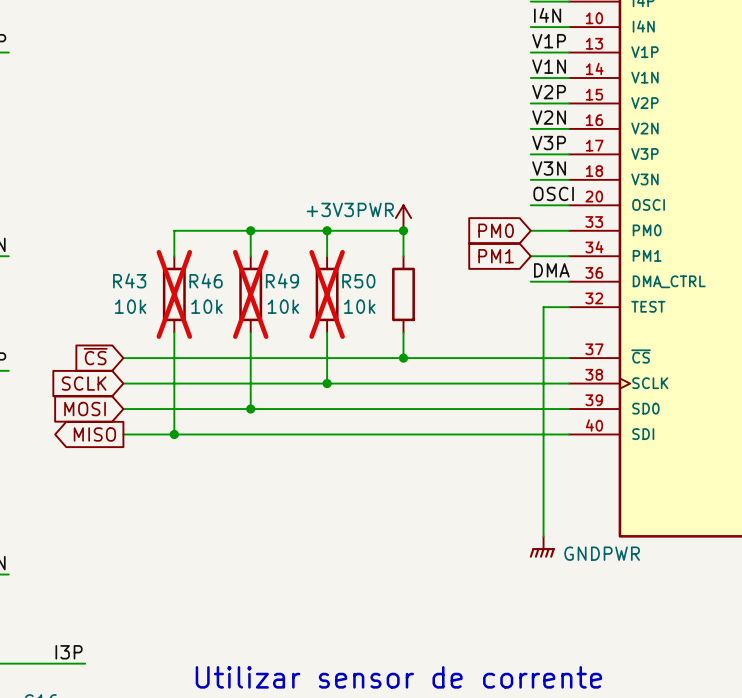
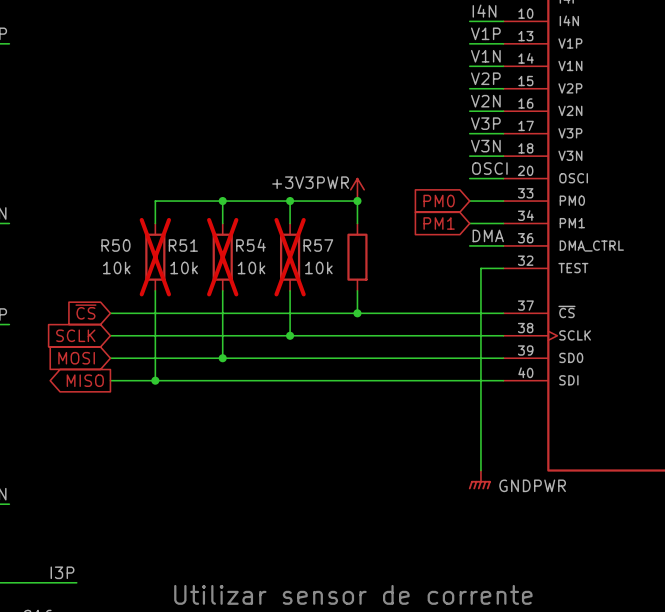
R43 name: R43 (129, 280) -> R50 (115, 245)
R46 name: R46 (206, 280) -> R51 (183, 245)
R49 name: R49 (282, 280) -> R54 (250, 245)
R50 name: R50 (358, 281) -> R57 (318, 245)

